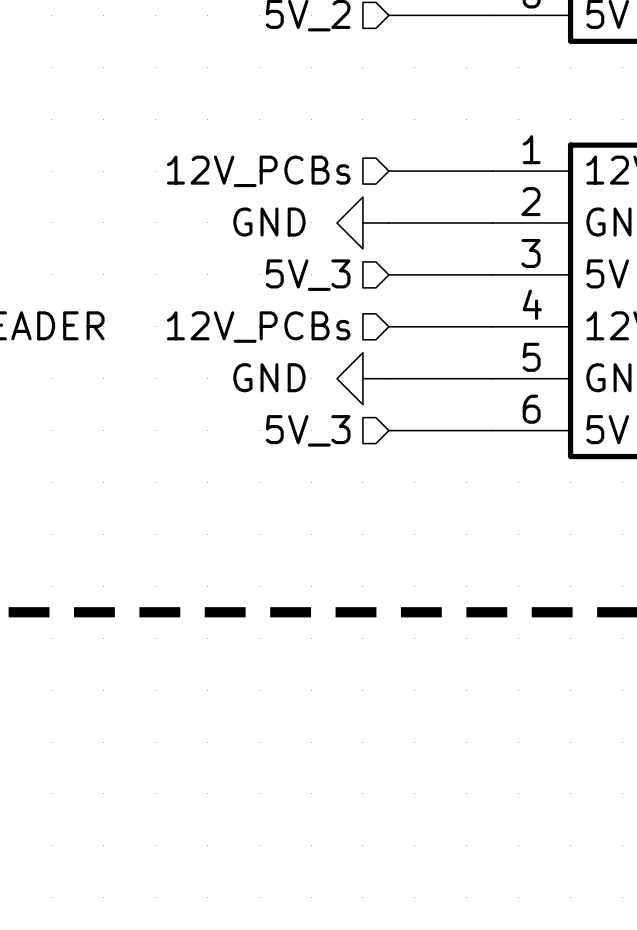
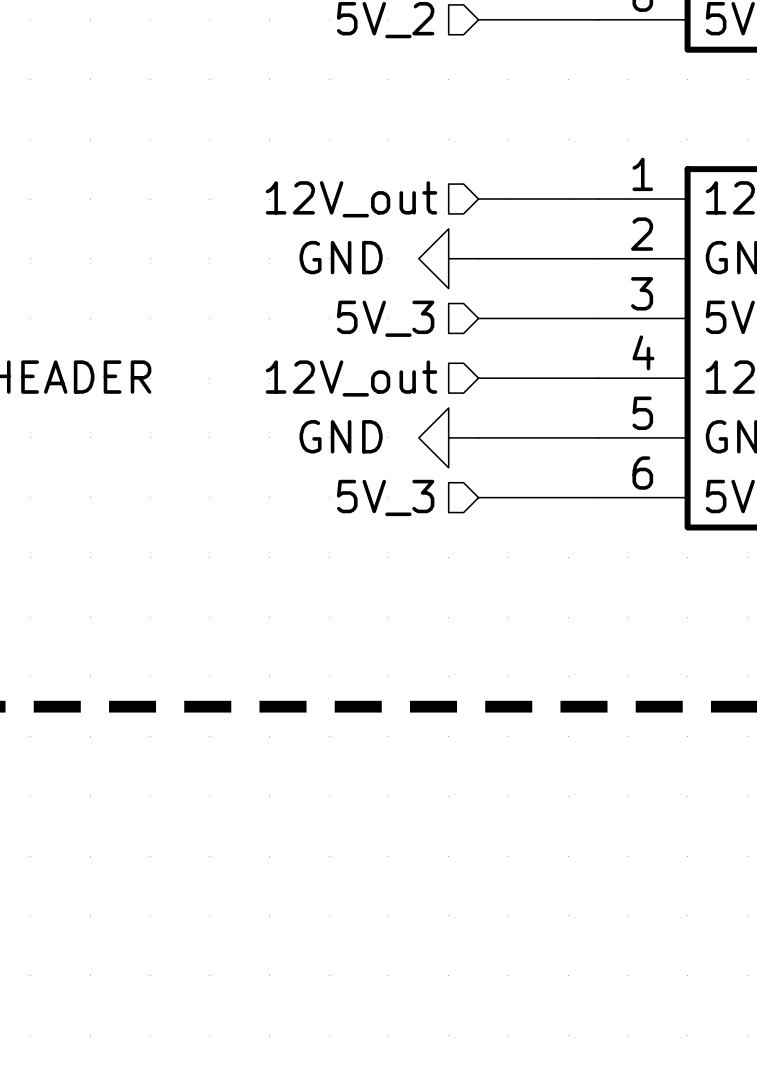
hierarchical label: 12V_PCBs (258, 171) -> 12V_out (351, 199)
hierarchical label: 12V_PCBs (258, 327) -> 12V_out (351, 378)

